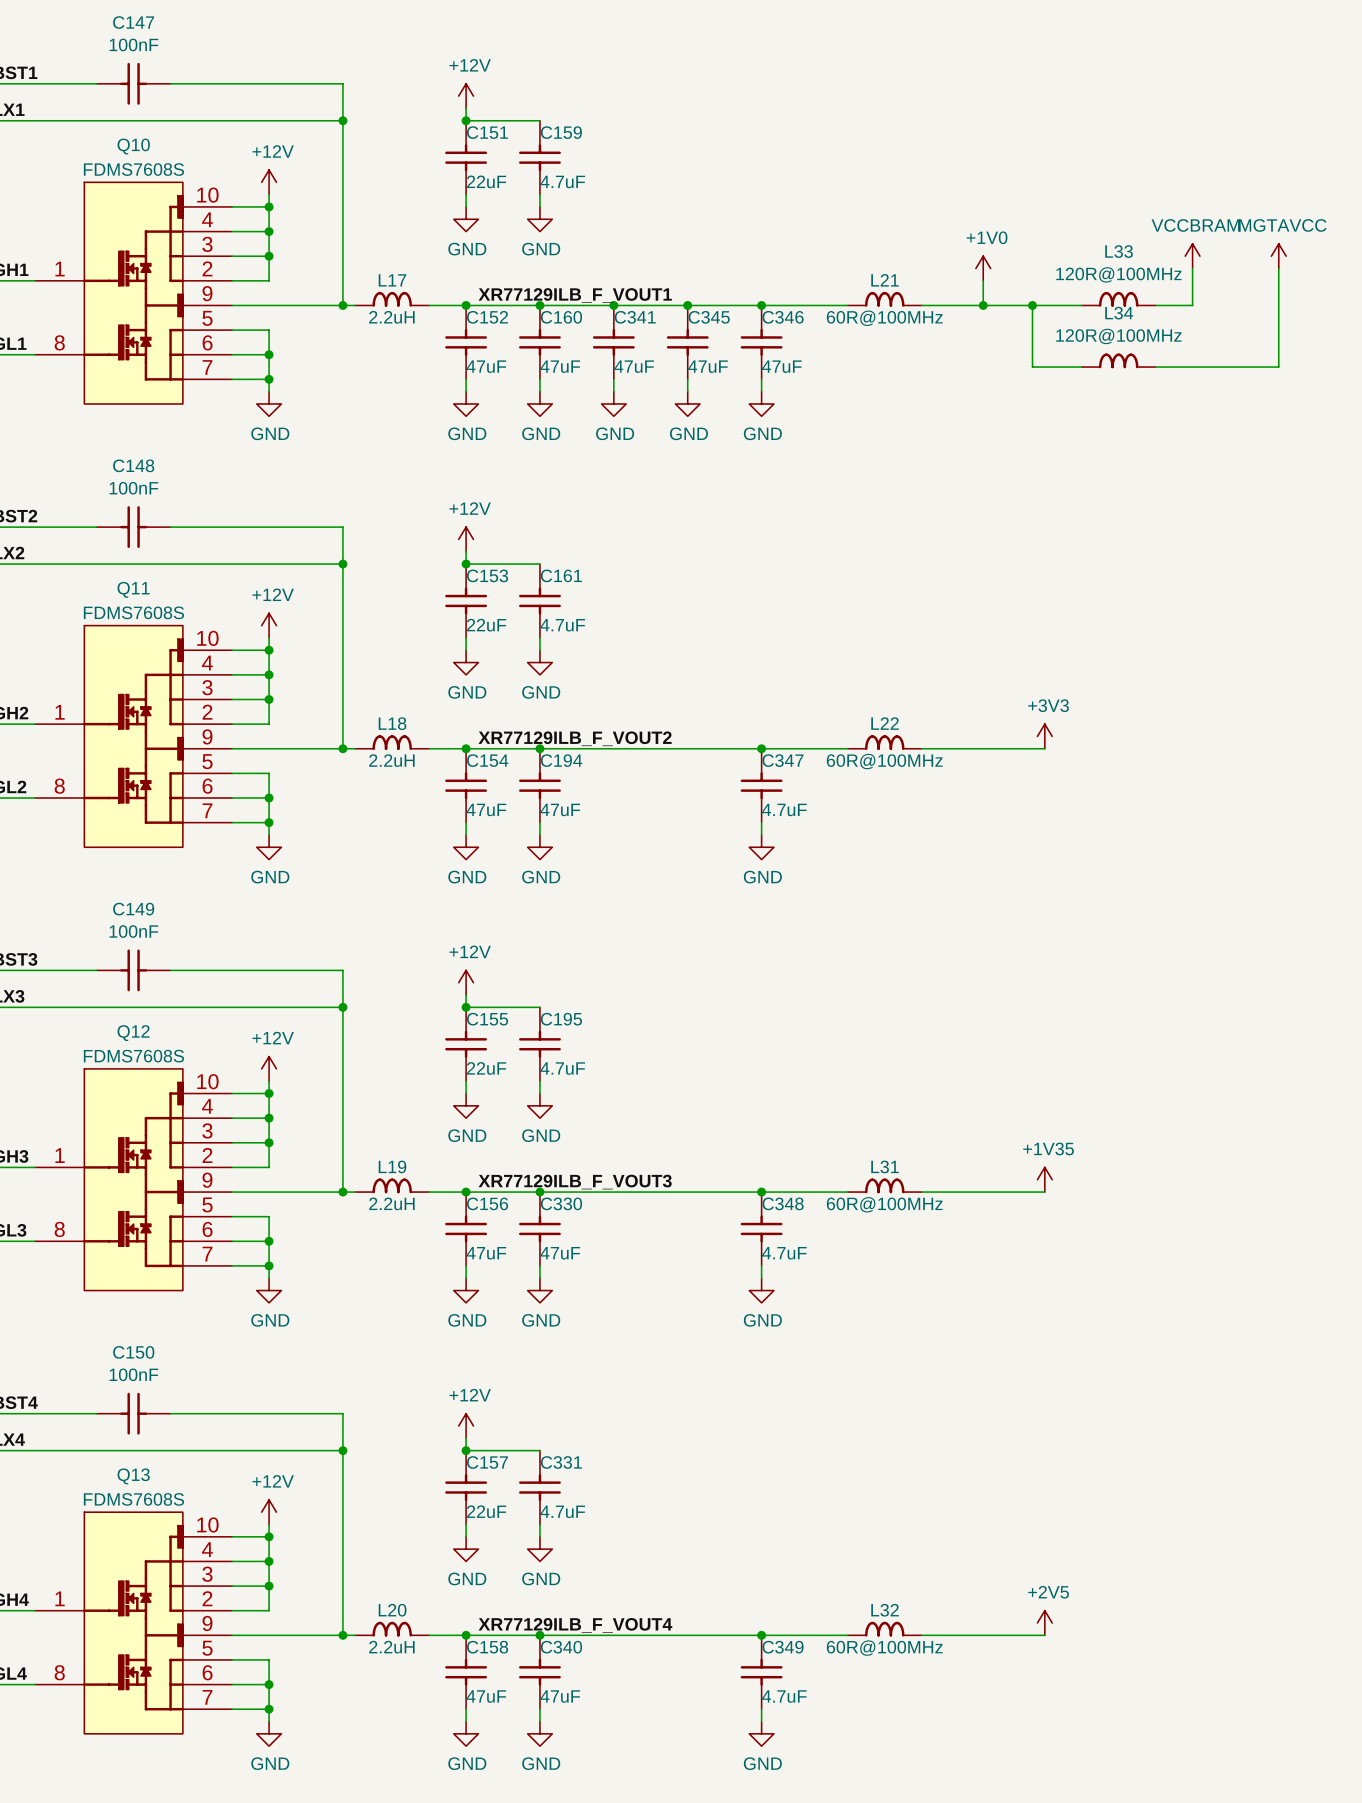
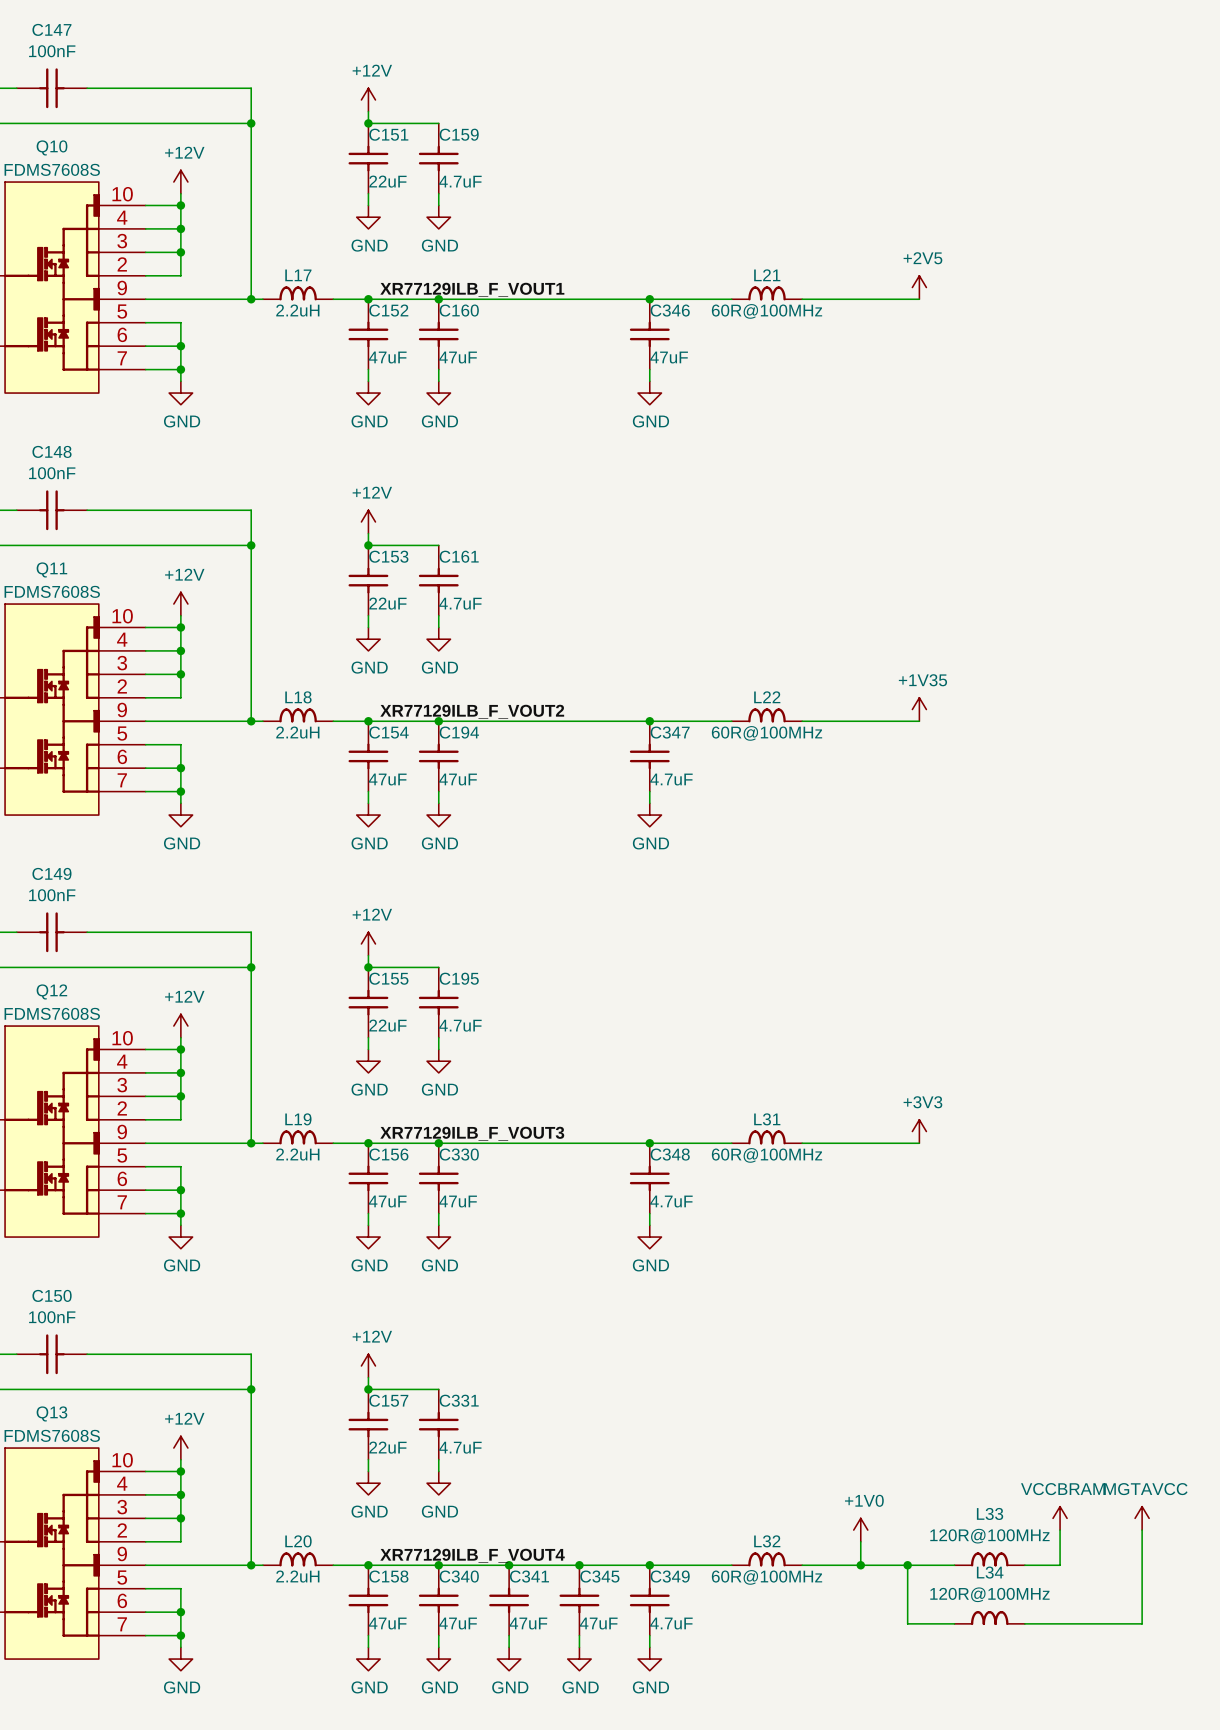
power symbol: VCCBRAM (1192, 256) -> none
power symbol: MGTAVCC (1278, 256) -> none
power symbol: +1V0 (983, 268) -> none
wire: (1192, 268) (1192, 305) (1155, 305) -> none
wire: (1278, 268) (1278, 367) (1155, 367) -> none
wire: (983, 280) (983, 305) -> none
power symbol: none -> +2V5 (919, 287)
L33 position: (1118, 299) -> (989, 1559)
junction: (613, 305) -> none
junction: (687, 305) -> none
junction: (983, 305) -> none
wire: (1032, 305) (1032, 367) (1081, 367) -> none
junction: (1032, 305) -> none
wire: (1044, 305) (1081, 305) -> none
C341 position: (613, 342) -> (509, 1600)
C345 position: (687, 342) -> (579, 1600)
L34 position: (1118, 360) -> (989, 1618)
wire: (613, 379) (613, 391) -> none
wire: (687, 379) (687, 391) -> none
power symbol: GND (613, 403) -> none
power symbol: GND (687, 403) -> none
power symbol: +3V3 (1044, 736) -> +1V35 (919, 709)
power symbol: +1V35 (1044, 1179) -> +3V3 (919, 1131)
power symbol: none -> VCCBRAM (1060, 1518)
power symbol: none -> MGTAVCC (1142, 1518)
power symbol: none -> +1V0 (860, 1530)
wire: none -> (1060, 1530) (1060, 1565) (1024, 1565)
wire: none -> (1142, 1530) (1142, 1623) (1024, 1623)
wire: none -> (860, 1541) (860, 1565)
power symbol: +2V5 (1044, 1623) -> none
junction: none -> (509, 1565)
junction: none -> (579, 1565)
junction: none -> (860, 1565)
wire: none -> (907, 1565) (907, 1623) (954, 1623)
junction: none -> (907, 1565)
wire: none -> (919, 1565) (954, 1565)
wire: none -> (509, 1635) (509, 1647)
wire: none -> (579, 1635) (579, 1647)
power symbol: none -> GND (509, 1659)
power symbol: none -> GND (579, 1659)

